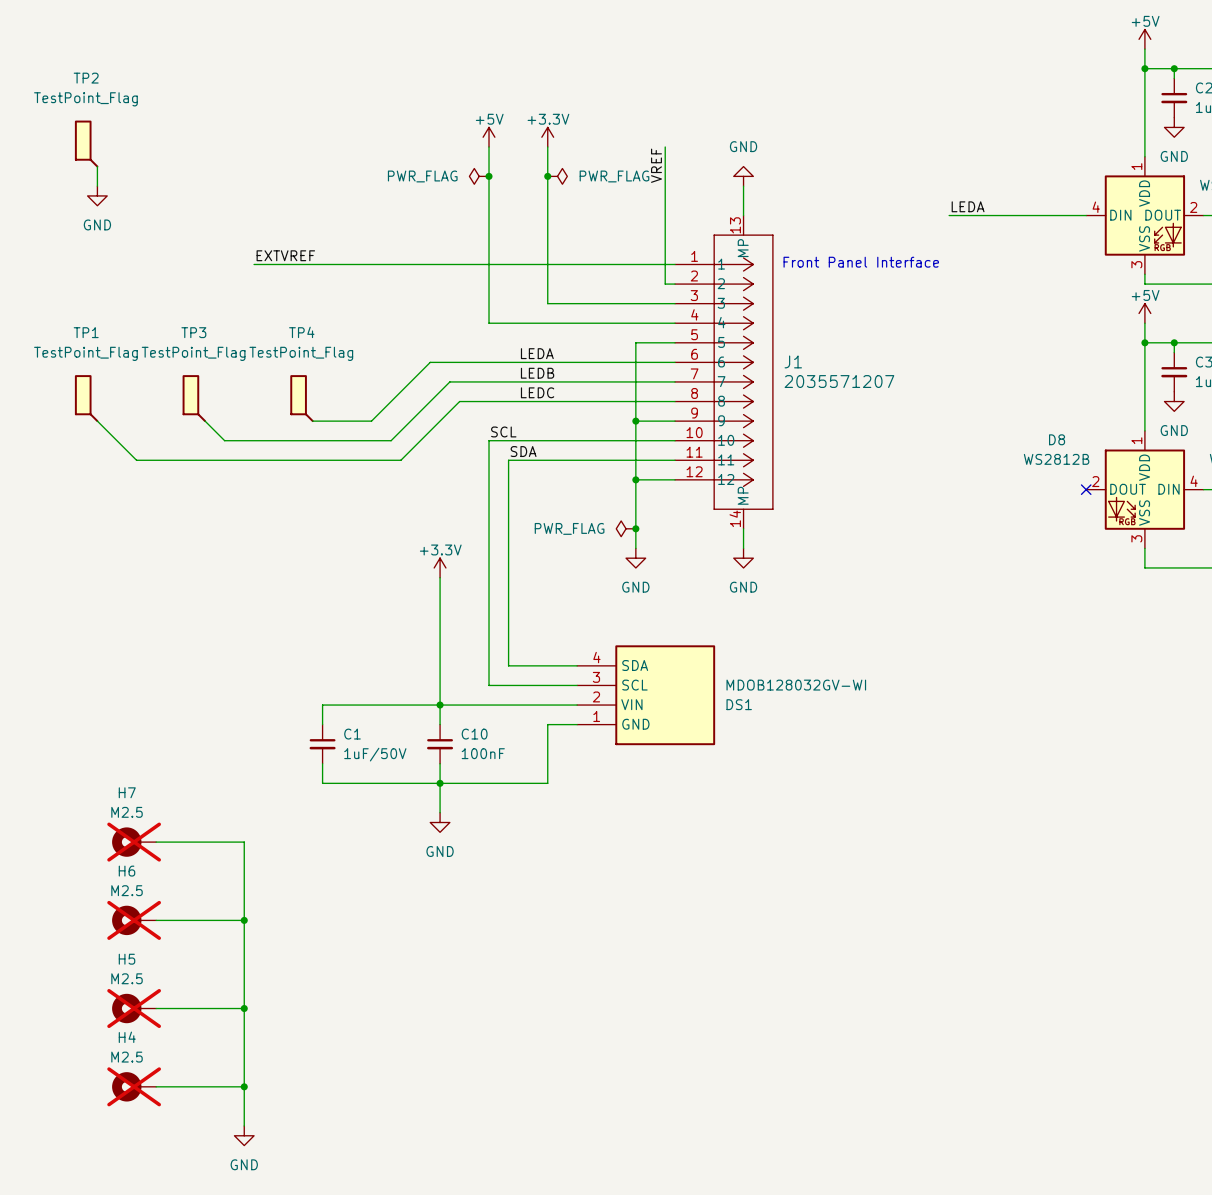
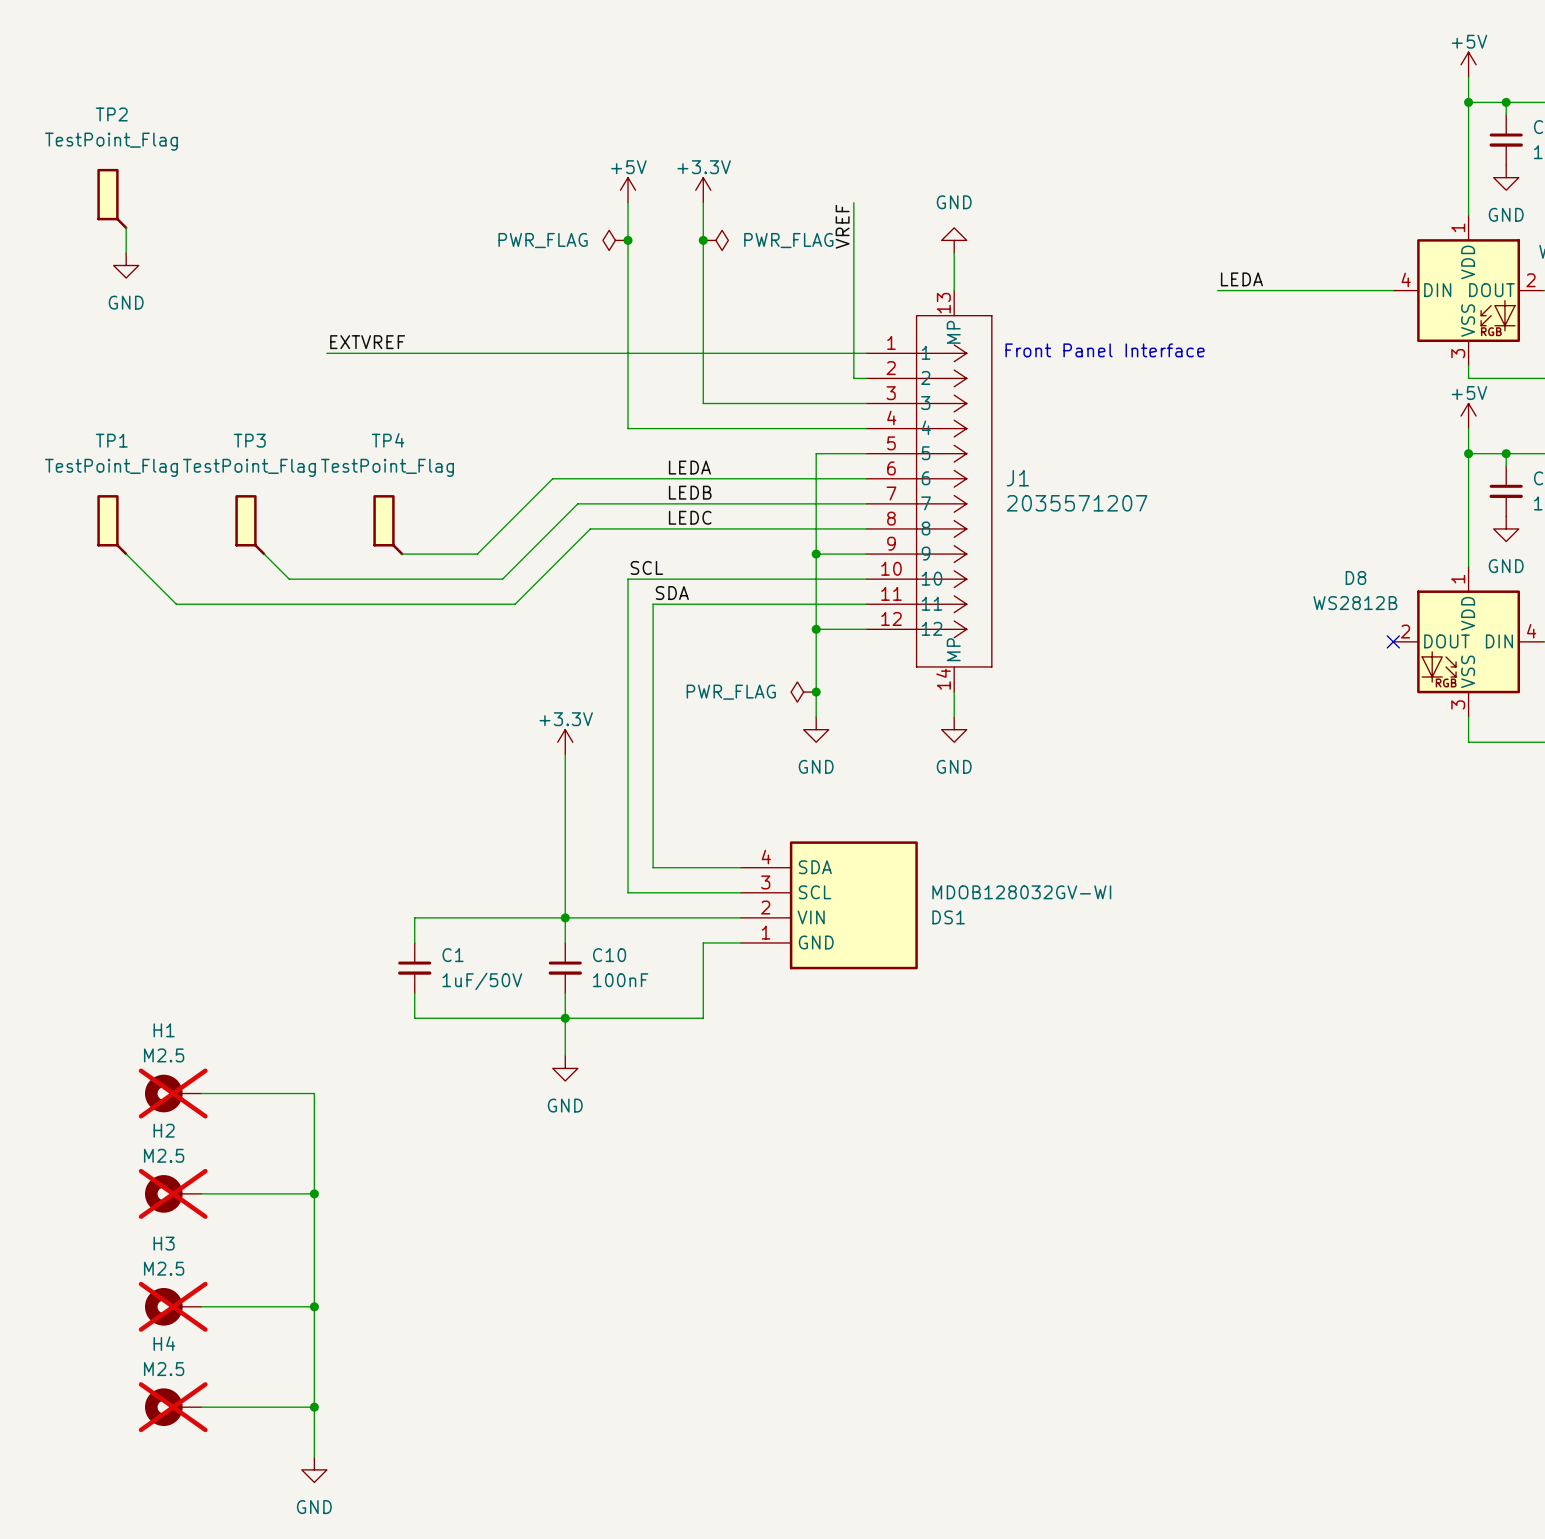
H7 name: H7 (127, 792) -> H1 (164, 1030)
H6 name: H6 (127, 871) -> H2 (164, 1130)
H5 name: H5 (127, 959) -> H3 (164, 1243)

